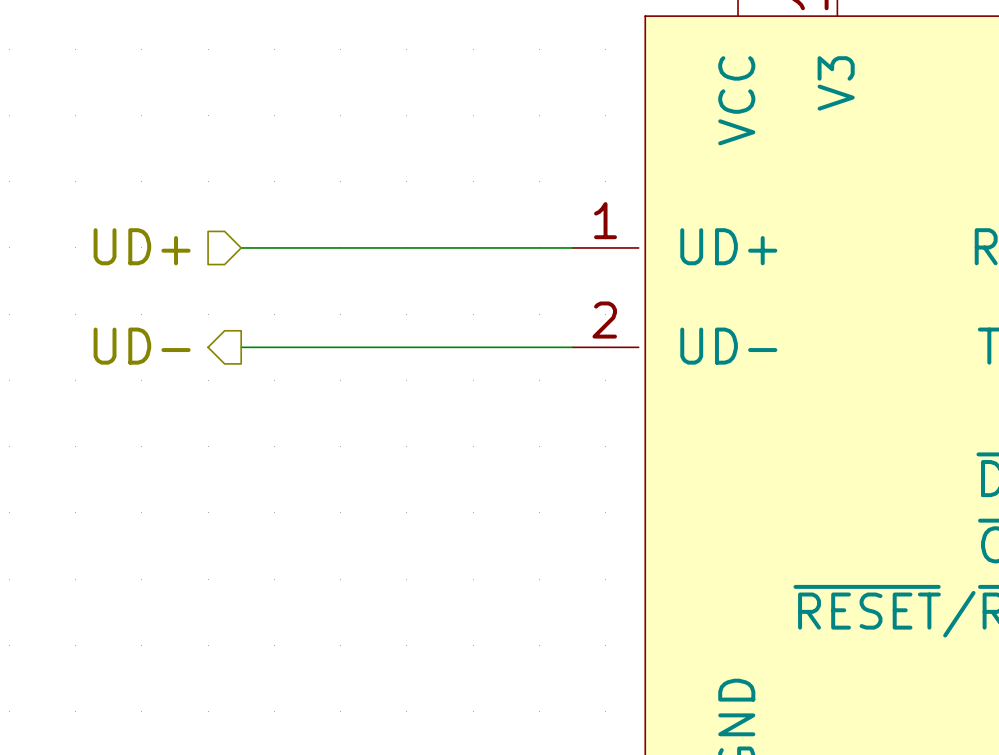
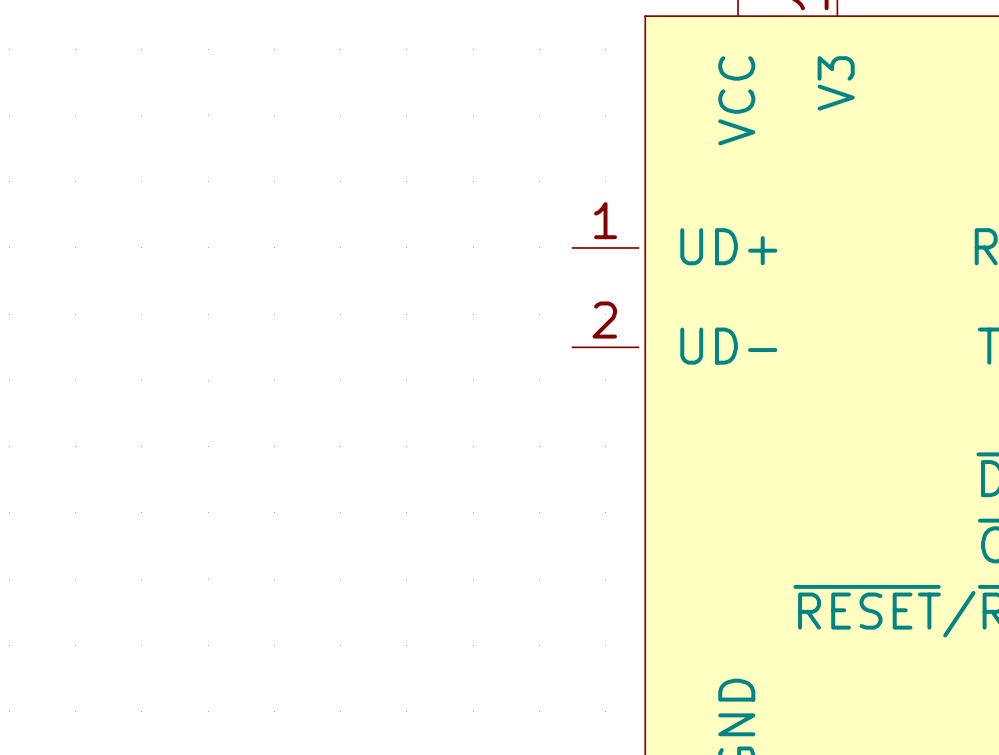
hierarchical label: UD+ (142, 246) -> none
wire: (241, 247) (572, 247) -> none
hierarchical label: UD- (142, 346) -> none
wire: (241, 347) (572, 347) -> none

